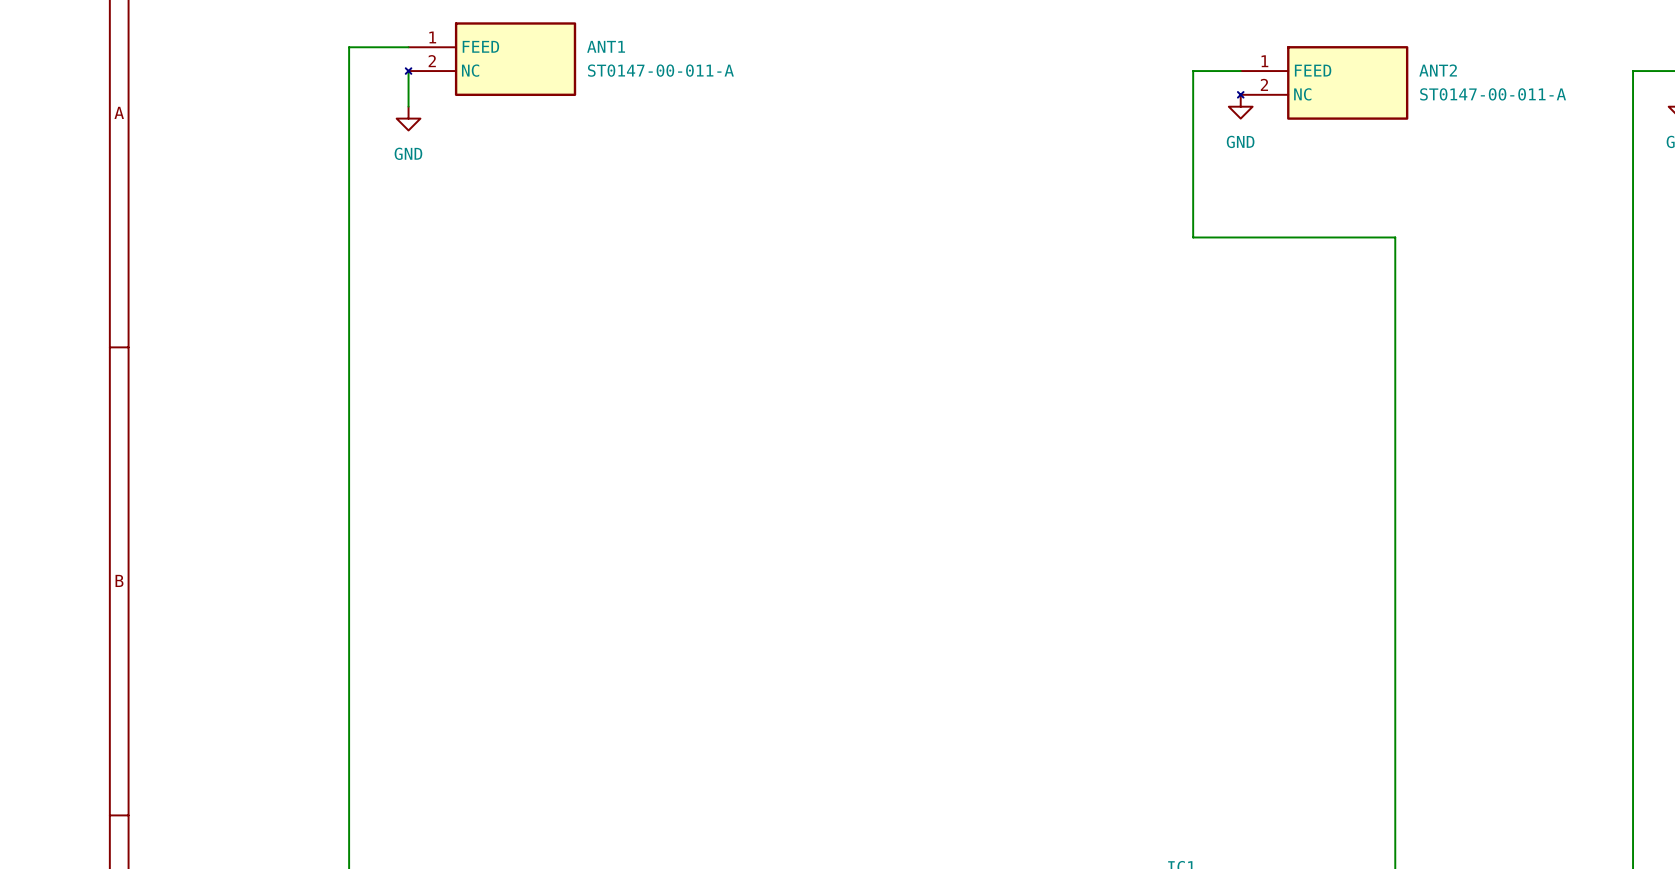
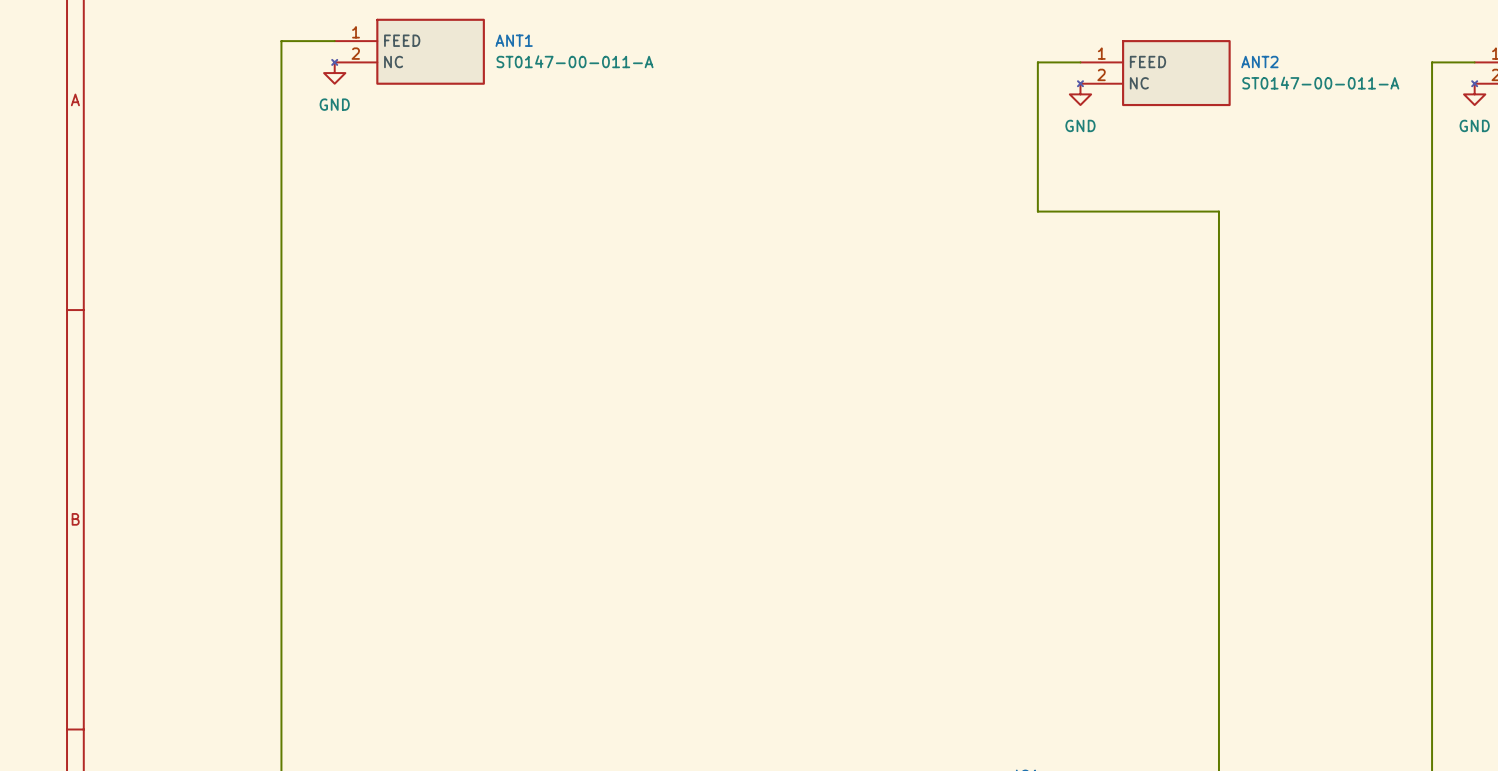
wire: (408, 71) (408, 106) -> none
power symbol position: GND (408, 118) -> GND (334, 73)

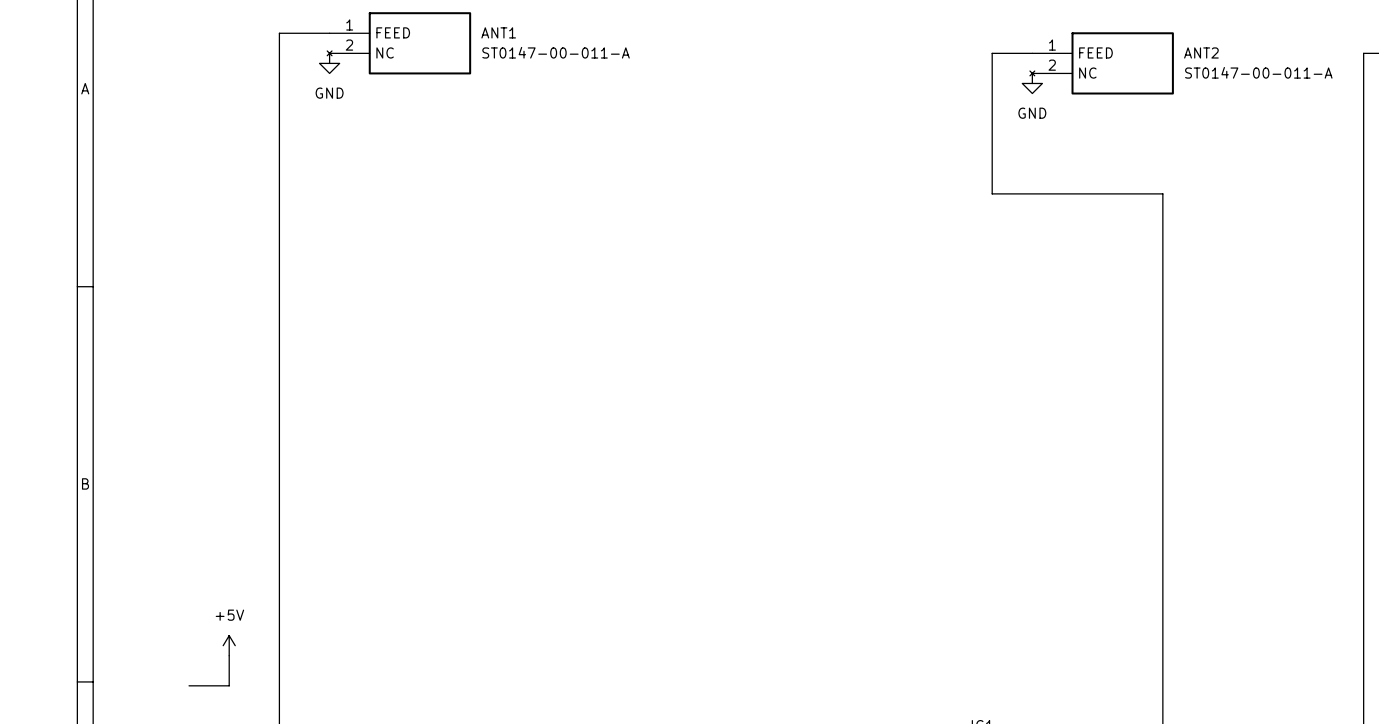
power symbol: none -> +5V (229, 645)
wire: none -> (229, 655) (229, 685) (189, 685)

